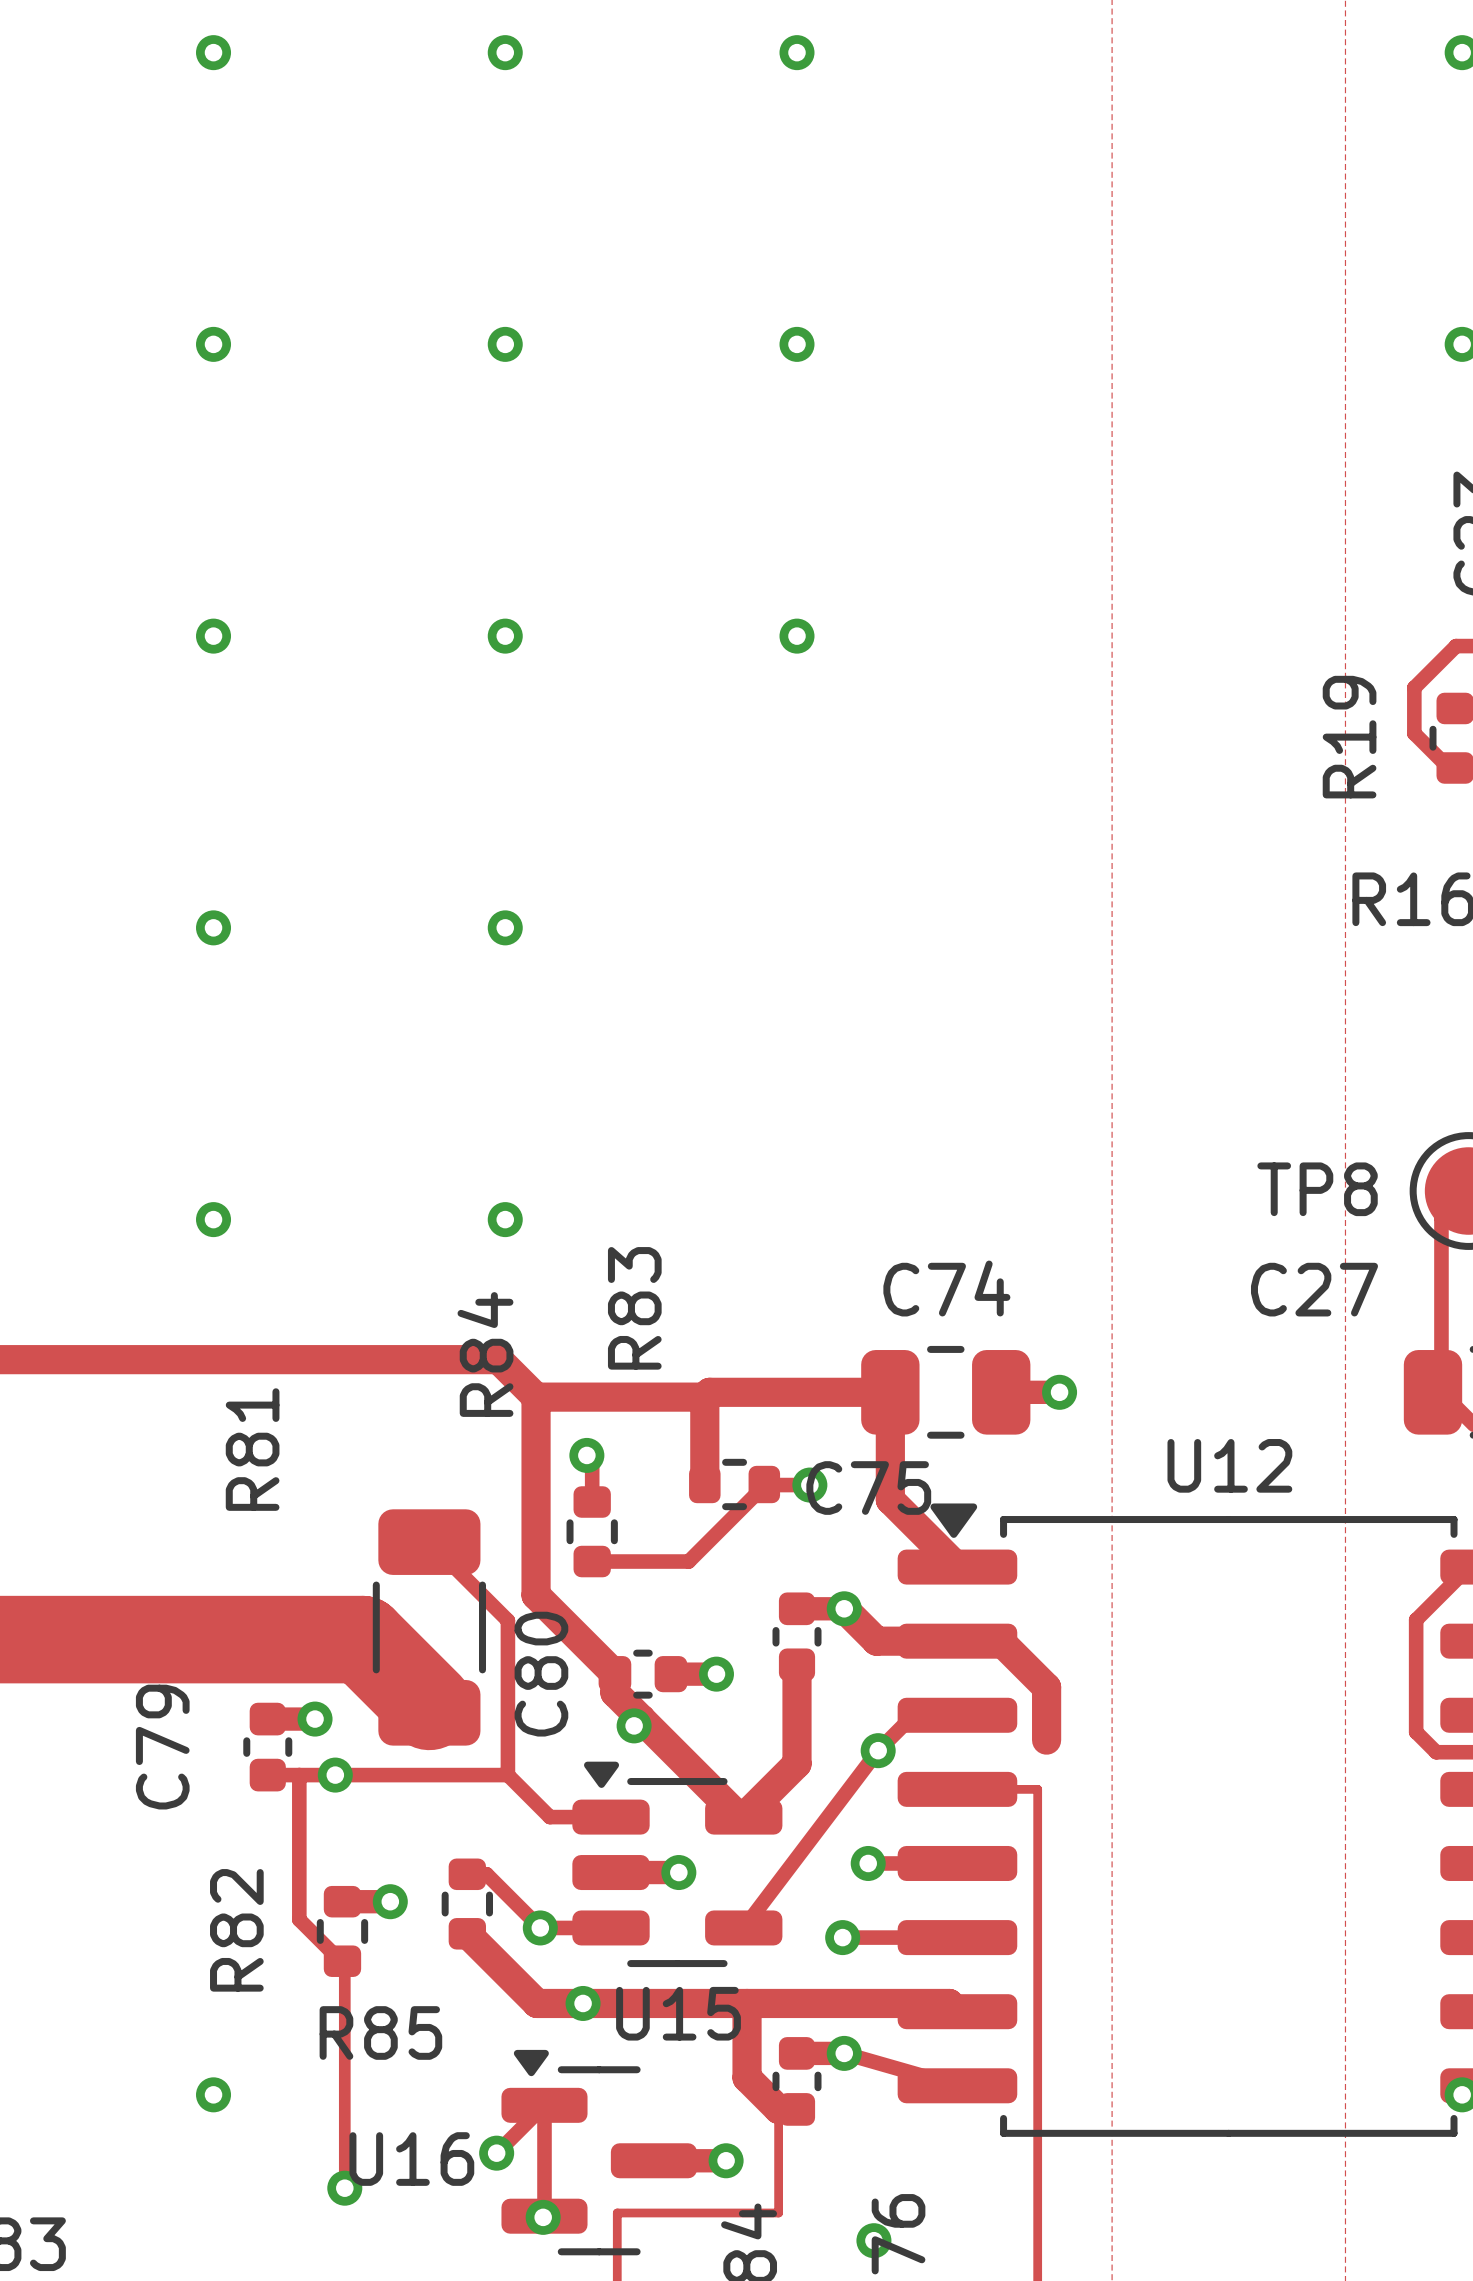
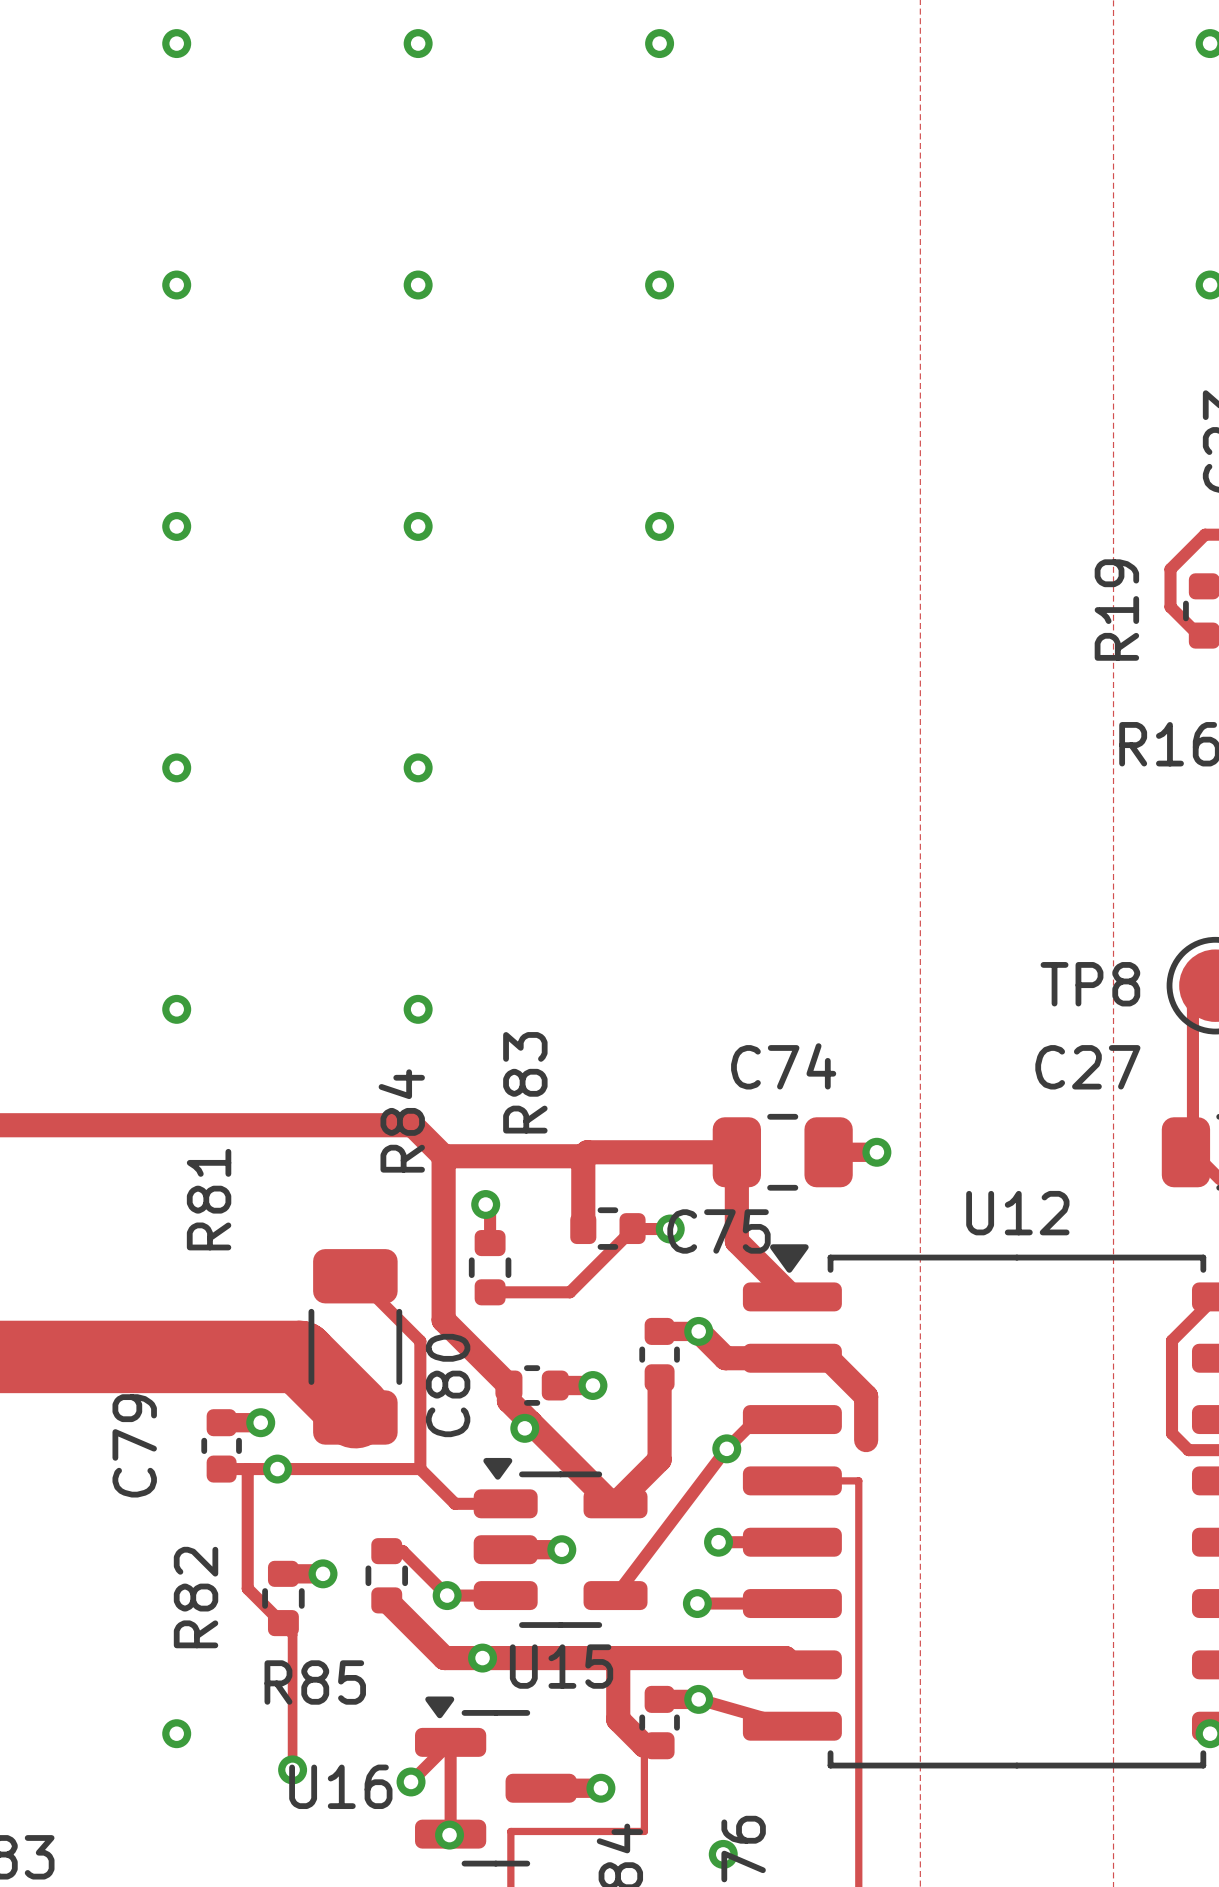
track: (344, 1963) (344, 2188) -> (285, 1625) (292, 1634) (292, 1769)
via position: (344, 2188) -> (292, 1769)

